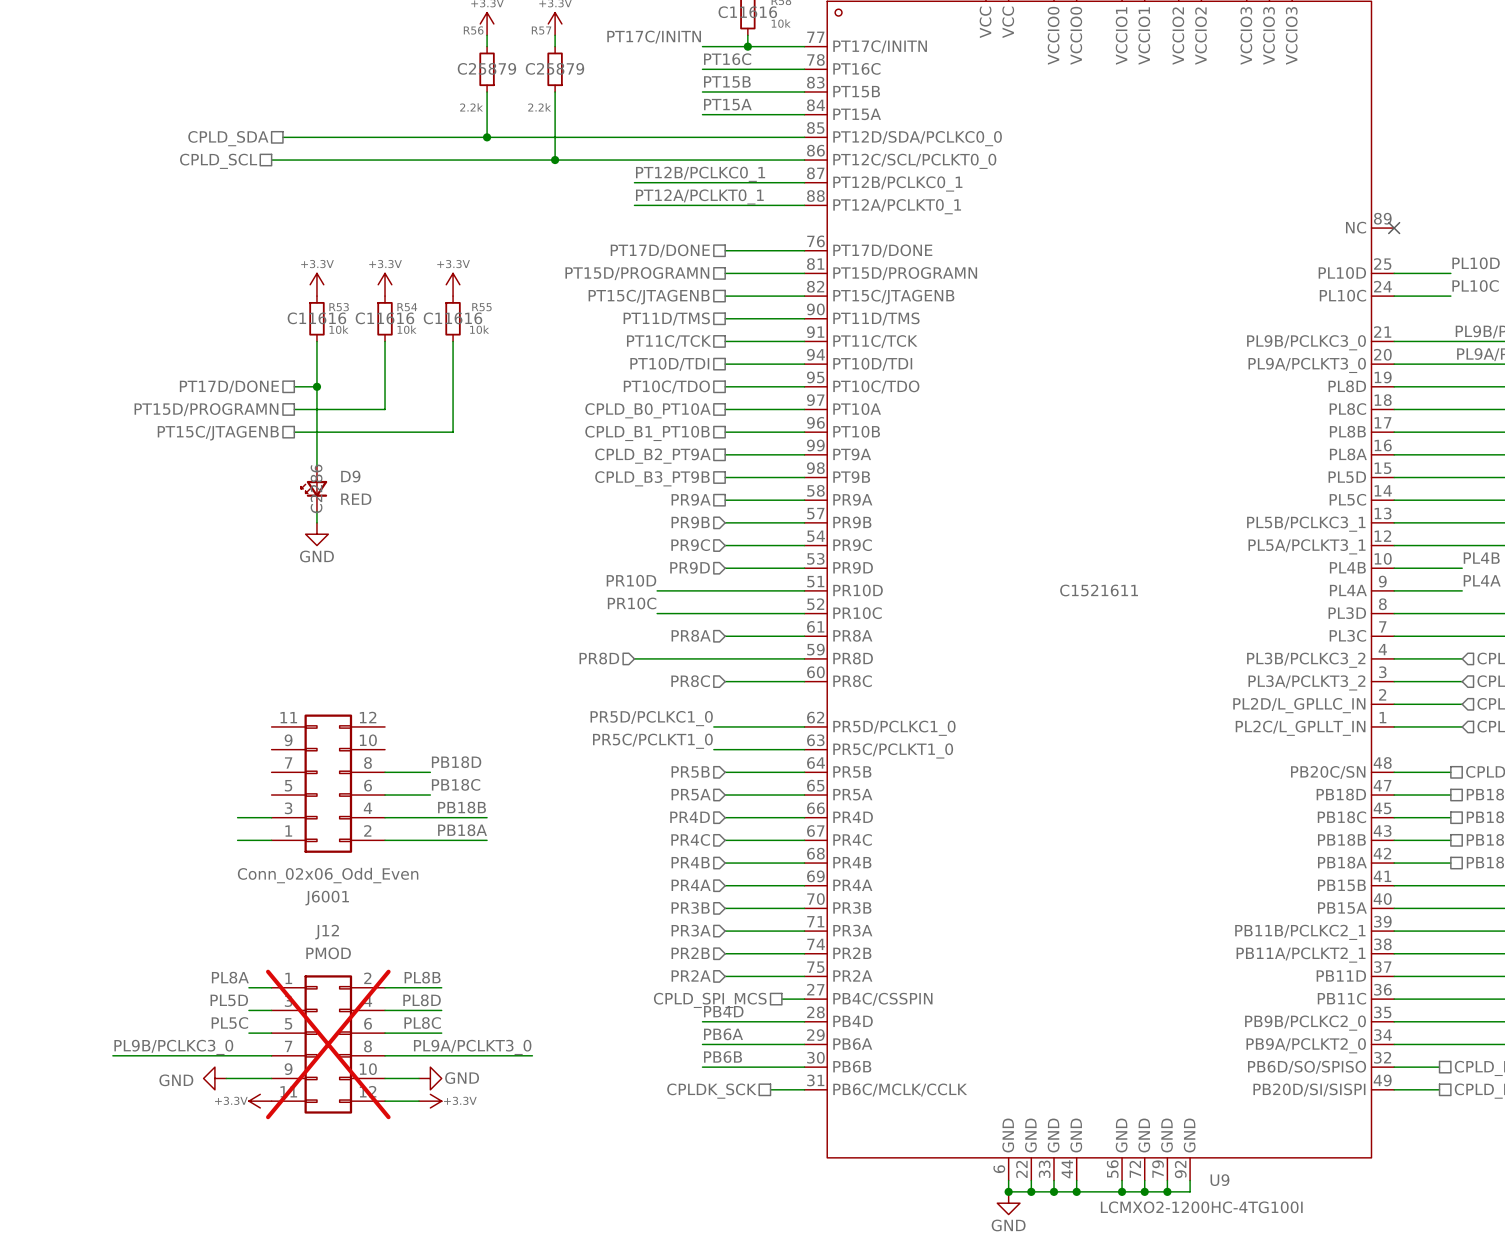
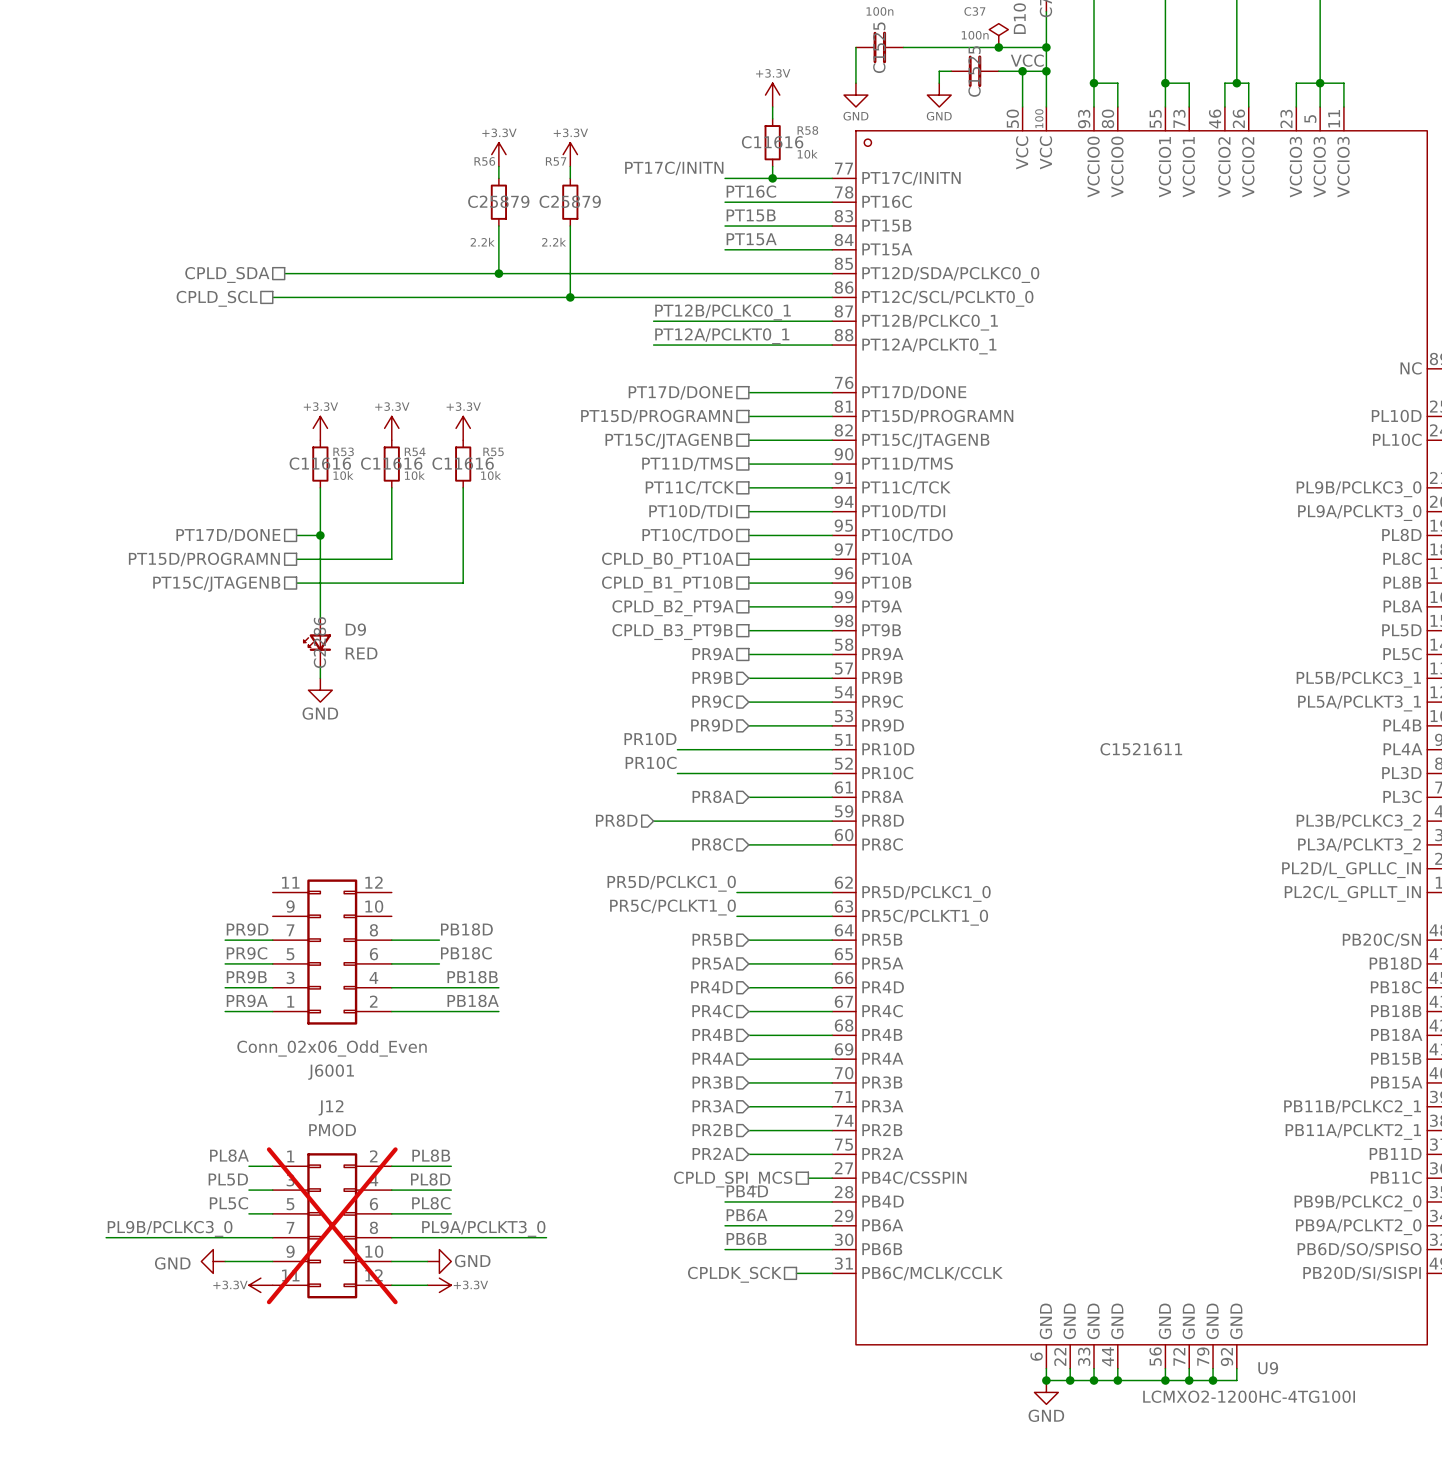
label: none -> PR9D (247, 929)
wire: none -> (225, 940) (272, 940)
label: none -> PR9C (246, 953)
wire: none -> (225, 963) (272, 963)
label: none -> PR9B (246, 977)
wire: none -> (225, 987) (237, 987)
label: none -> PR9A (247, 1000)
wire: none -> (225, 1011) (237, 1011)

